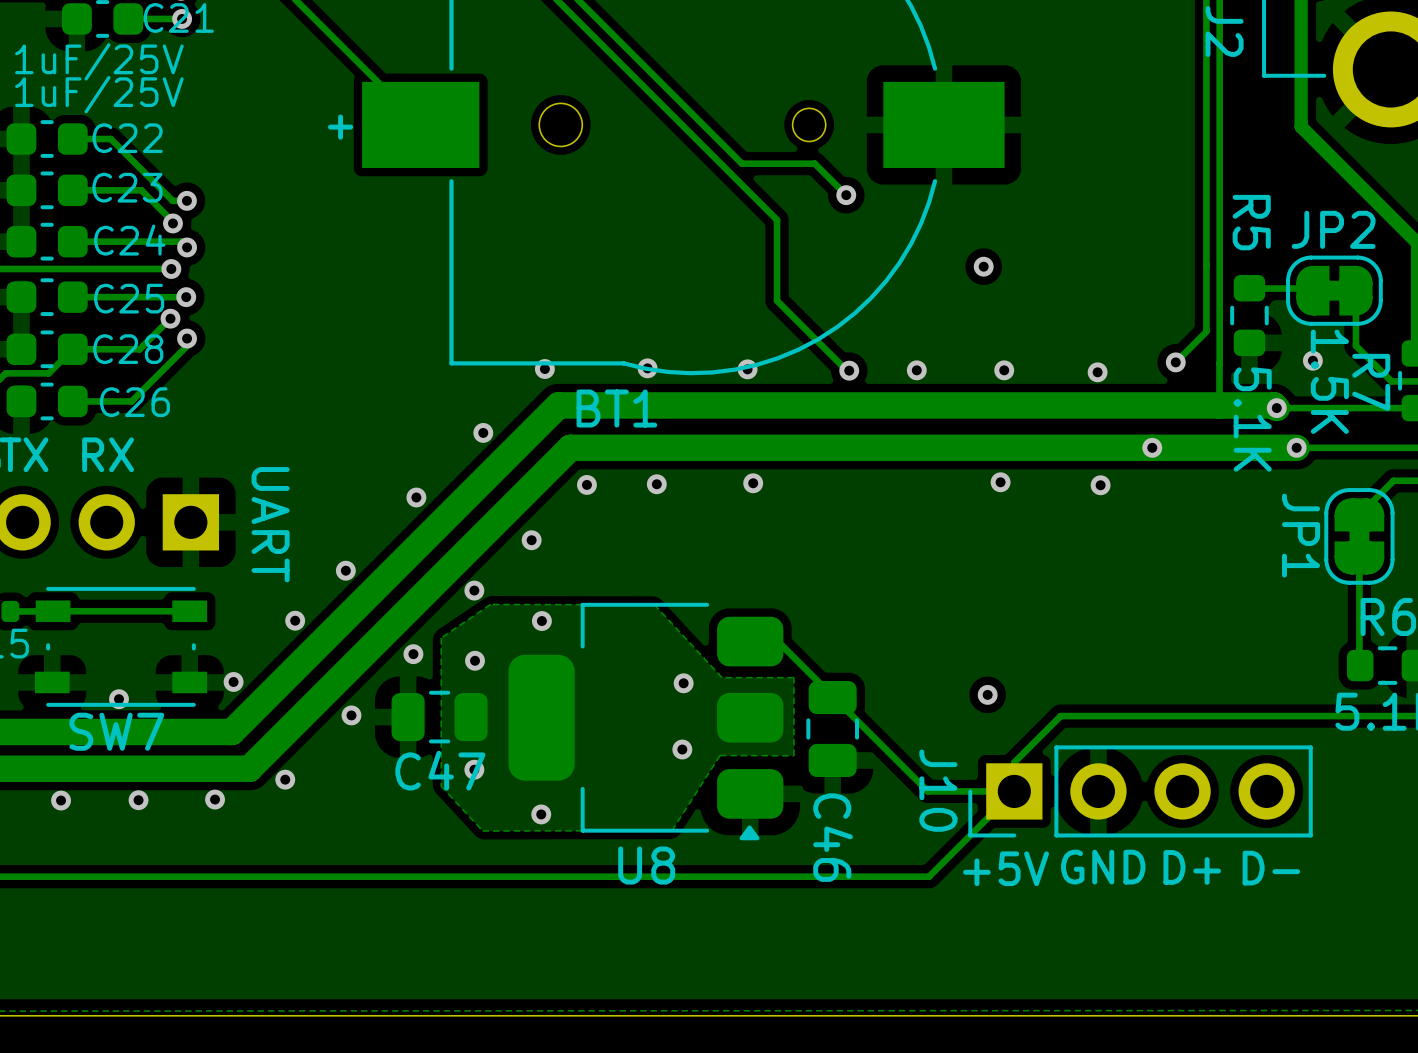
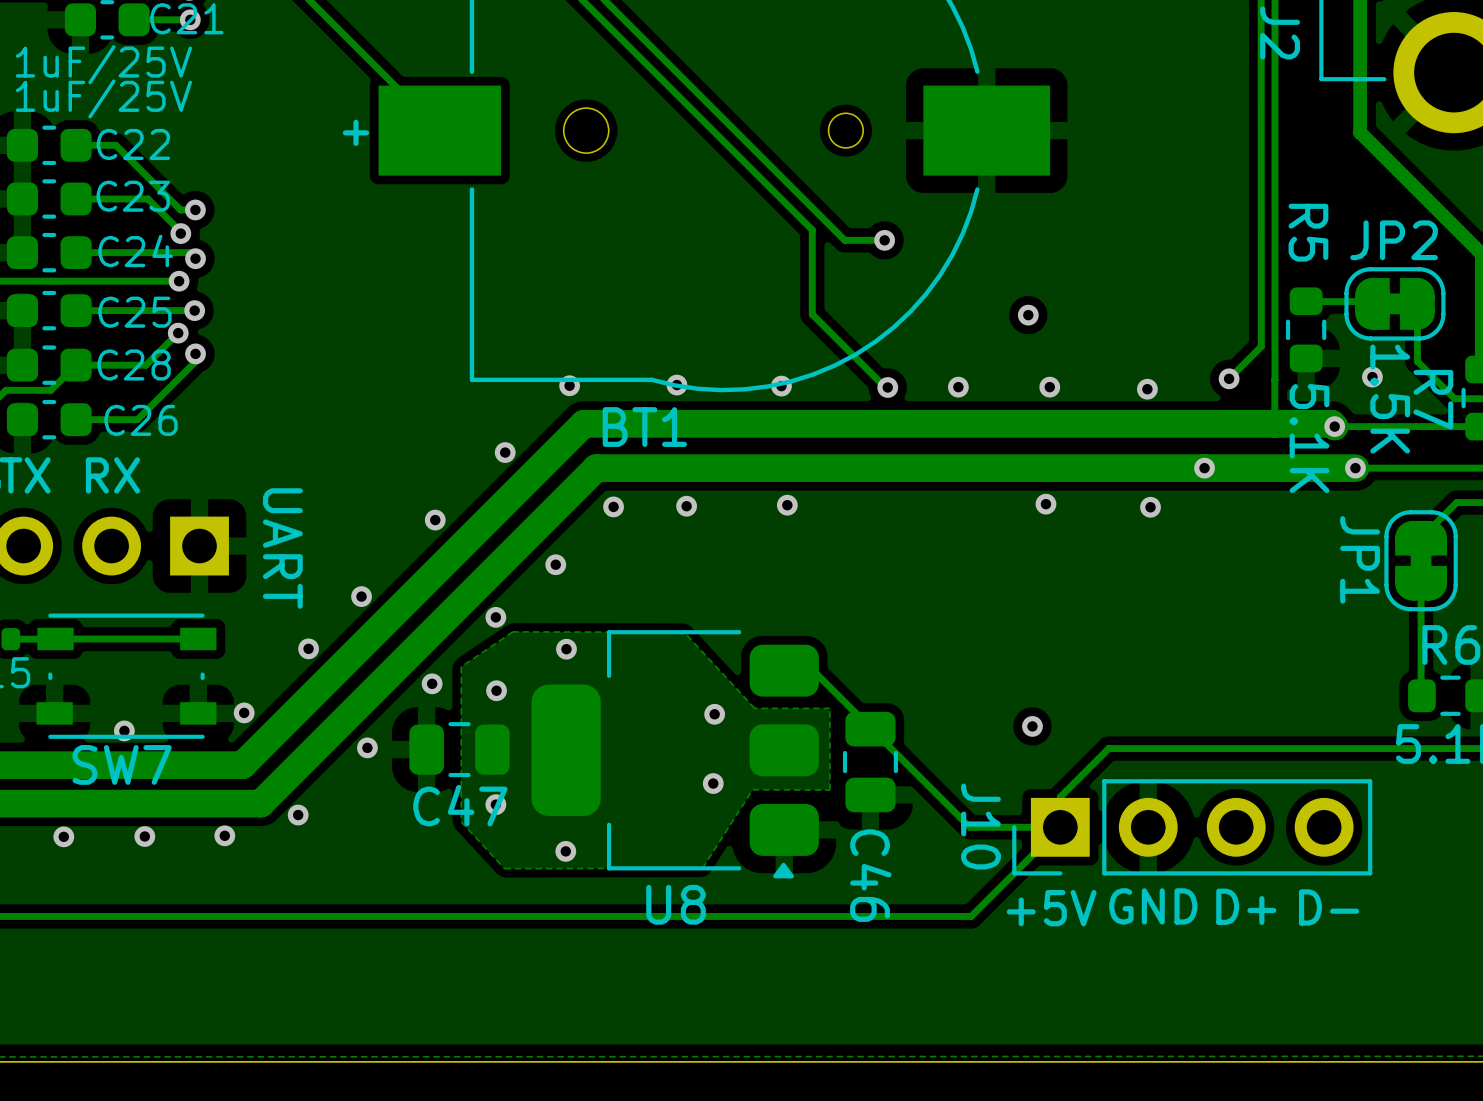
track: (741, 163) (814, 163) (846, 195) -> (775, 171) (844, 240) (884, 240)
via position: (846, 195) -> (884, 240)
via position: (983, 266) -> (1028, 315)

